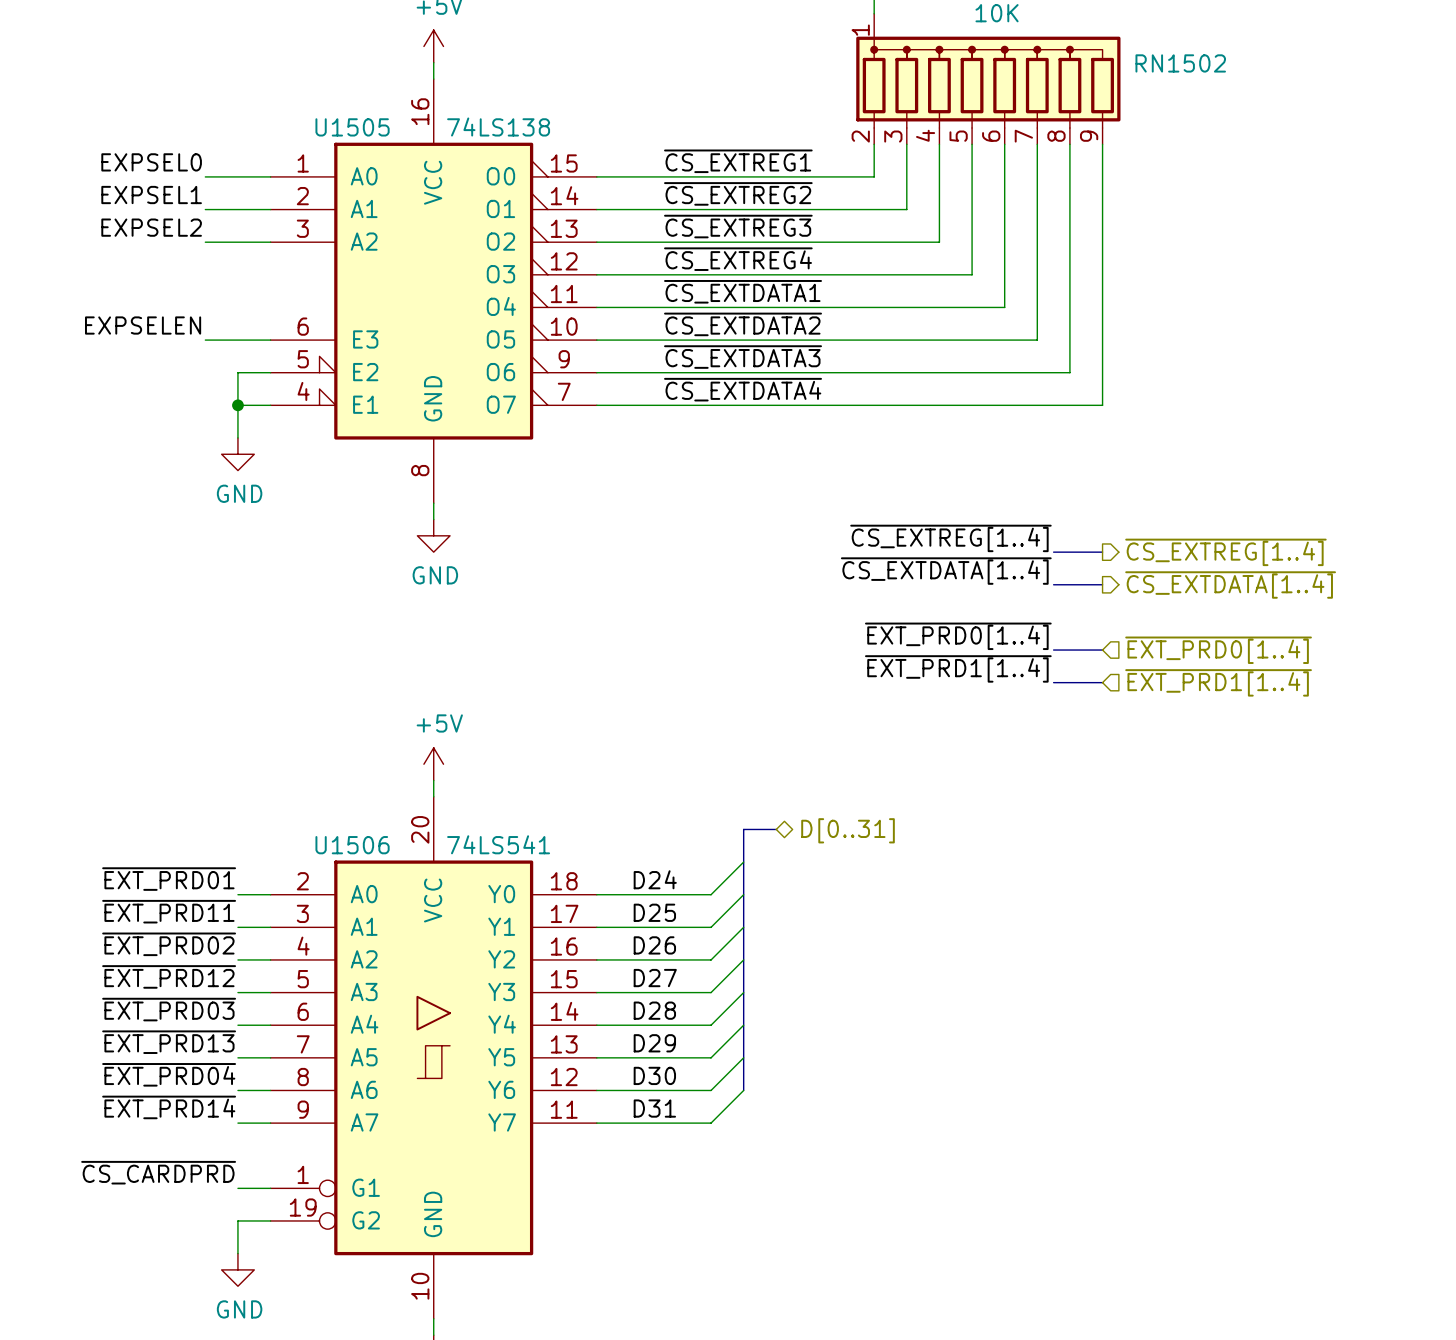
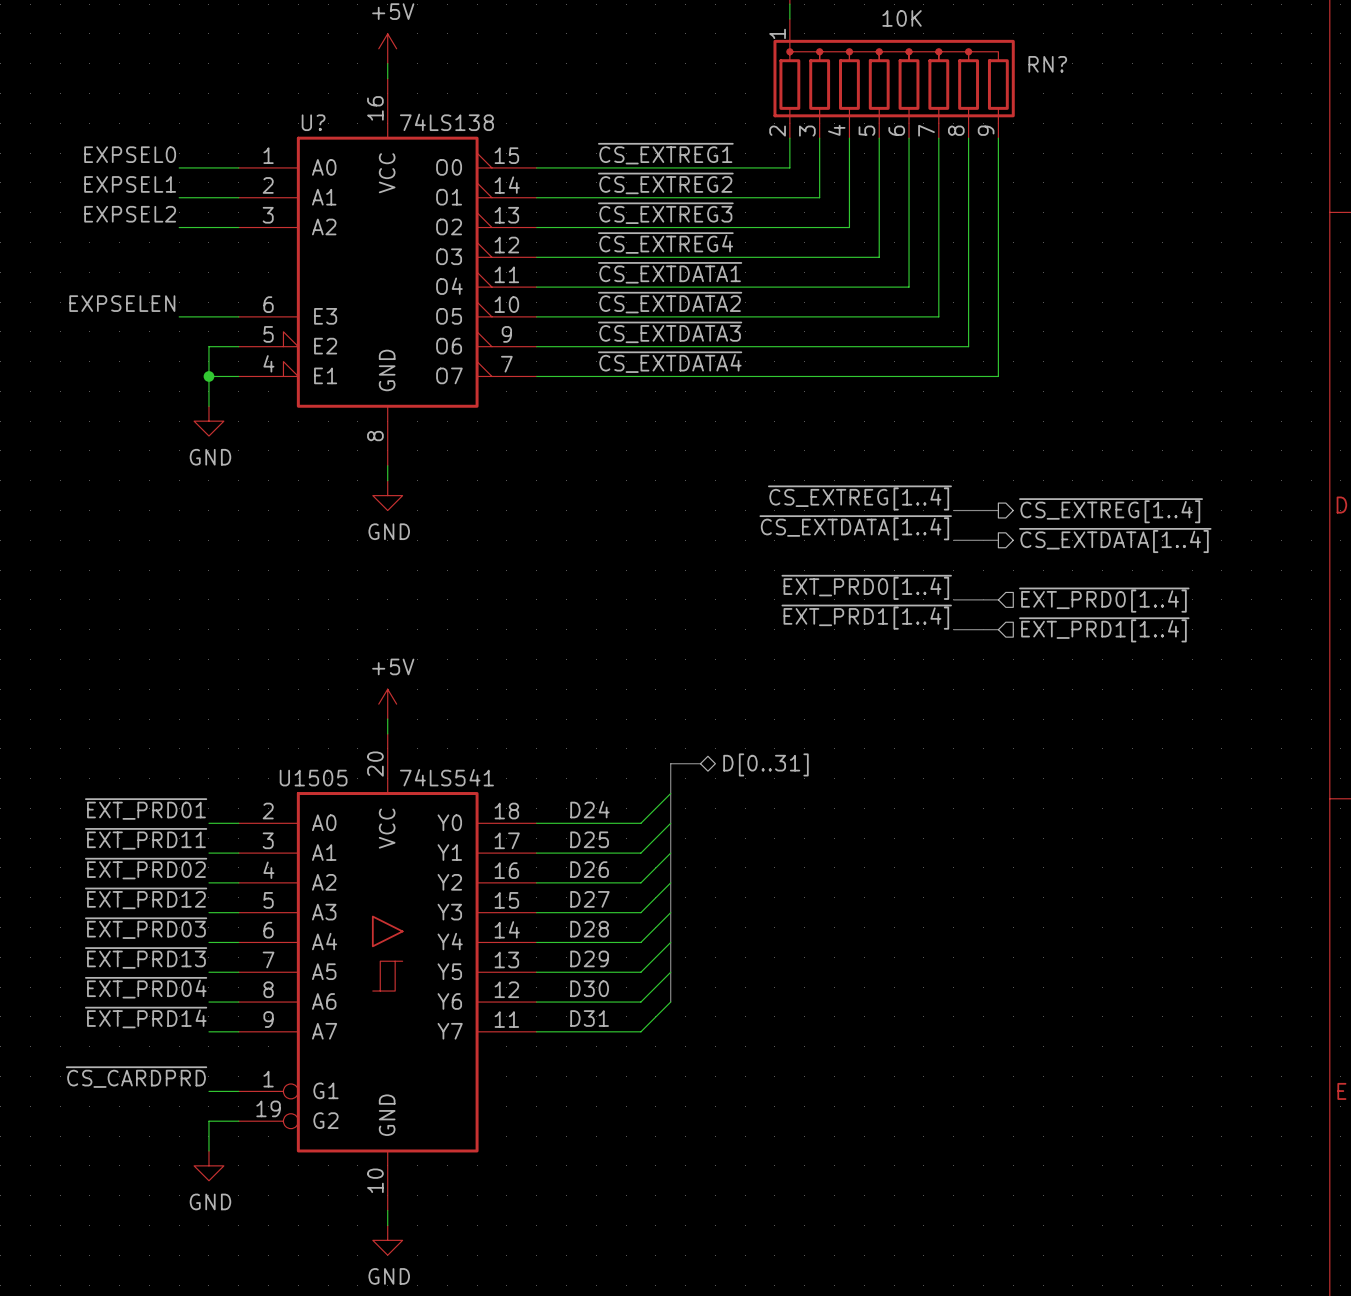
RN1502 name: RN1502 (1180, 63) -> RN? (1047, 64)
U1505 name: U1505 (352, 127) -> U? (313, 122)
U1506 name: U1506 (352, 845) -> U1505 (313, 778)

